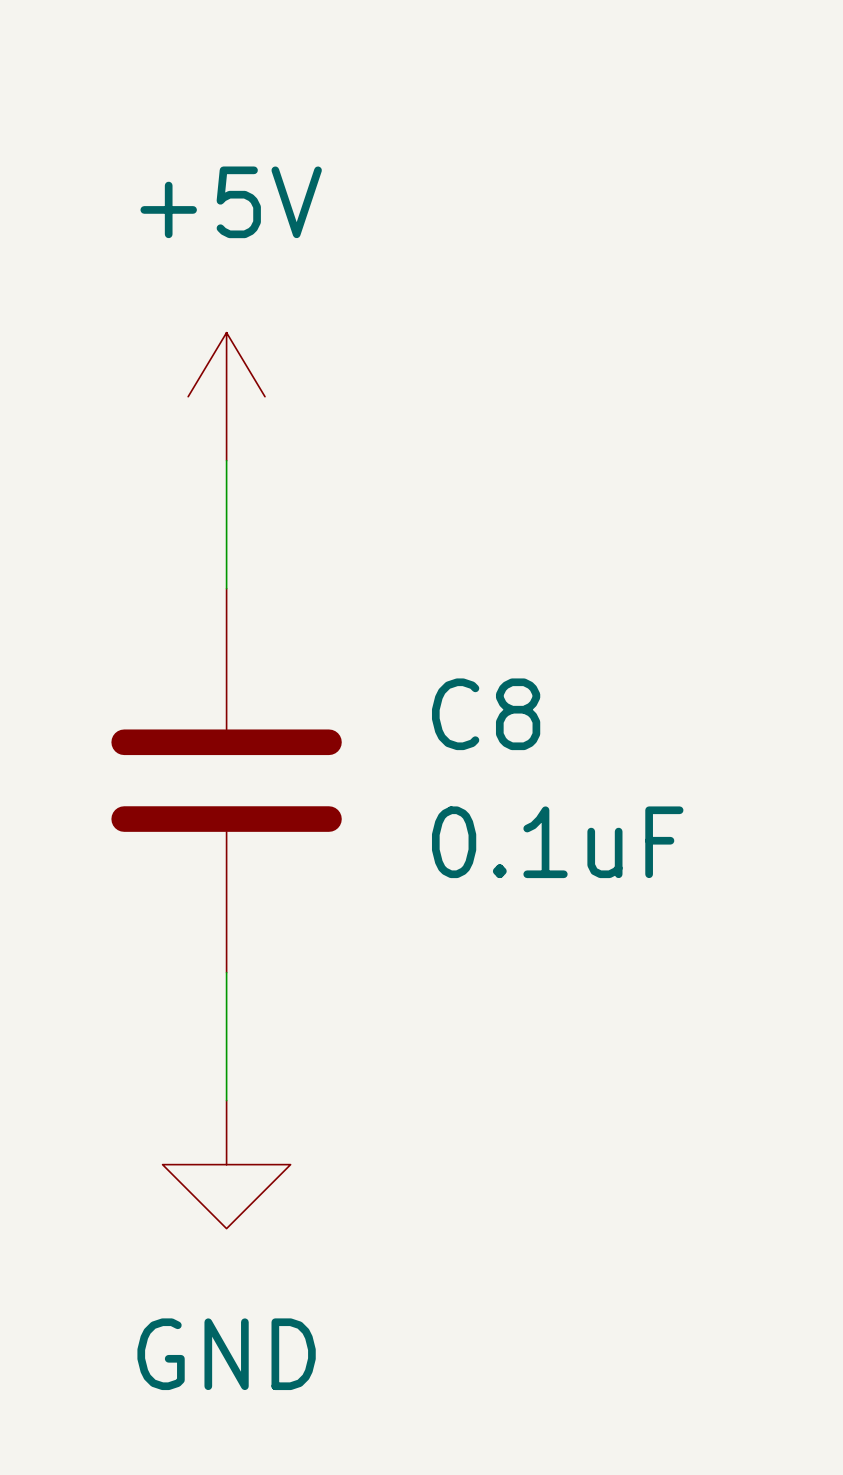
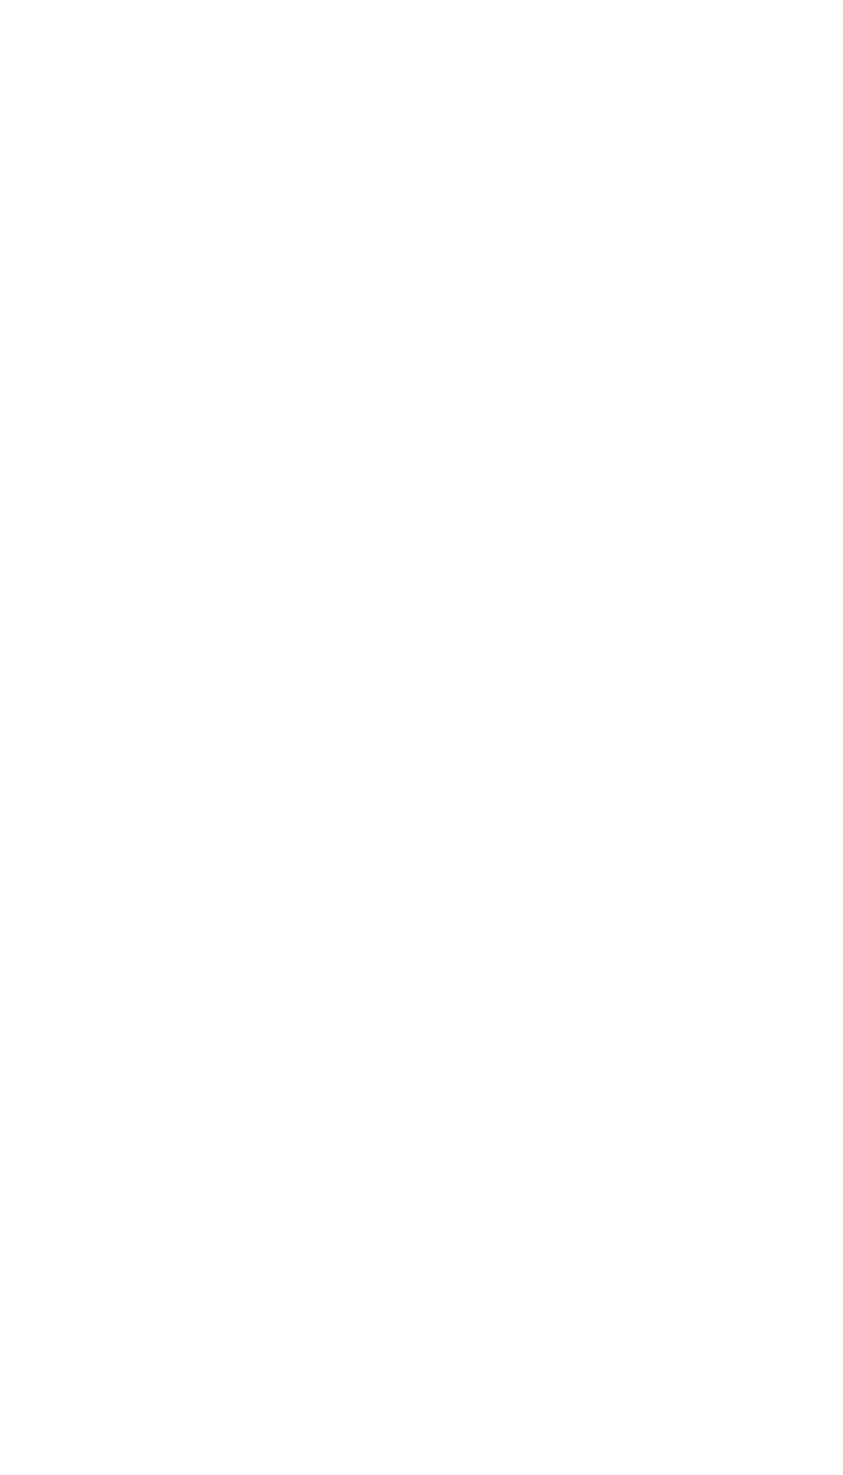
power symbol: +5V (226, 396) -> none
wire: (226, 460) (226, 588) -> none
C8: 0.1uF (226, 780) -> none
wire: (226, 972) (226, 1100) -> none
power symbol: GND (226, 1164) -> none

